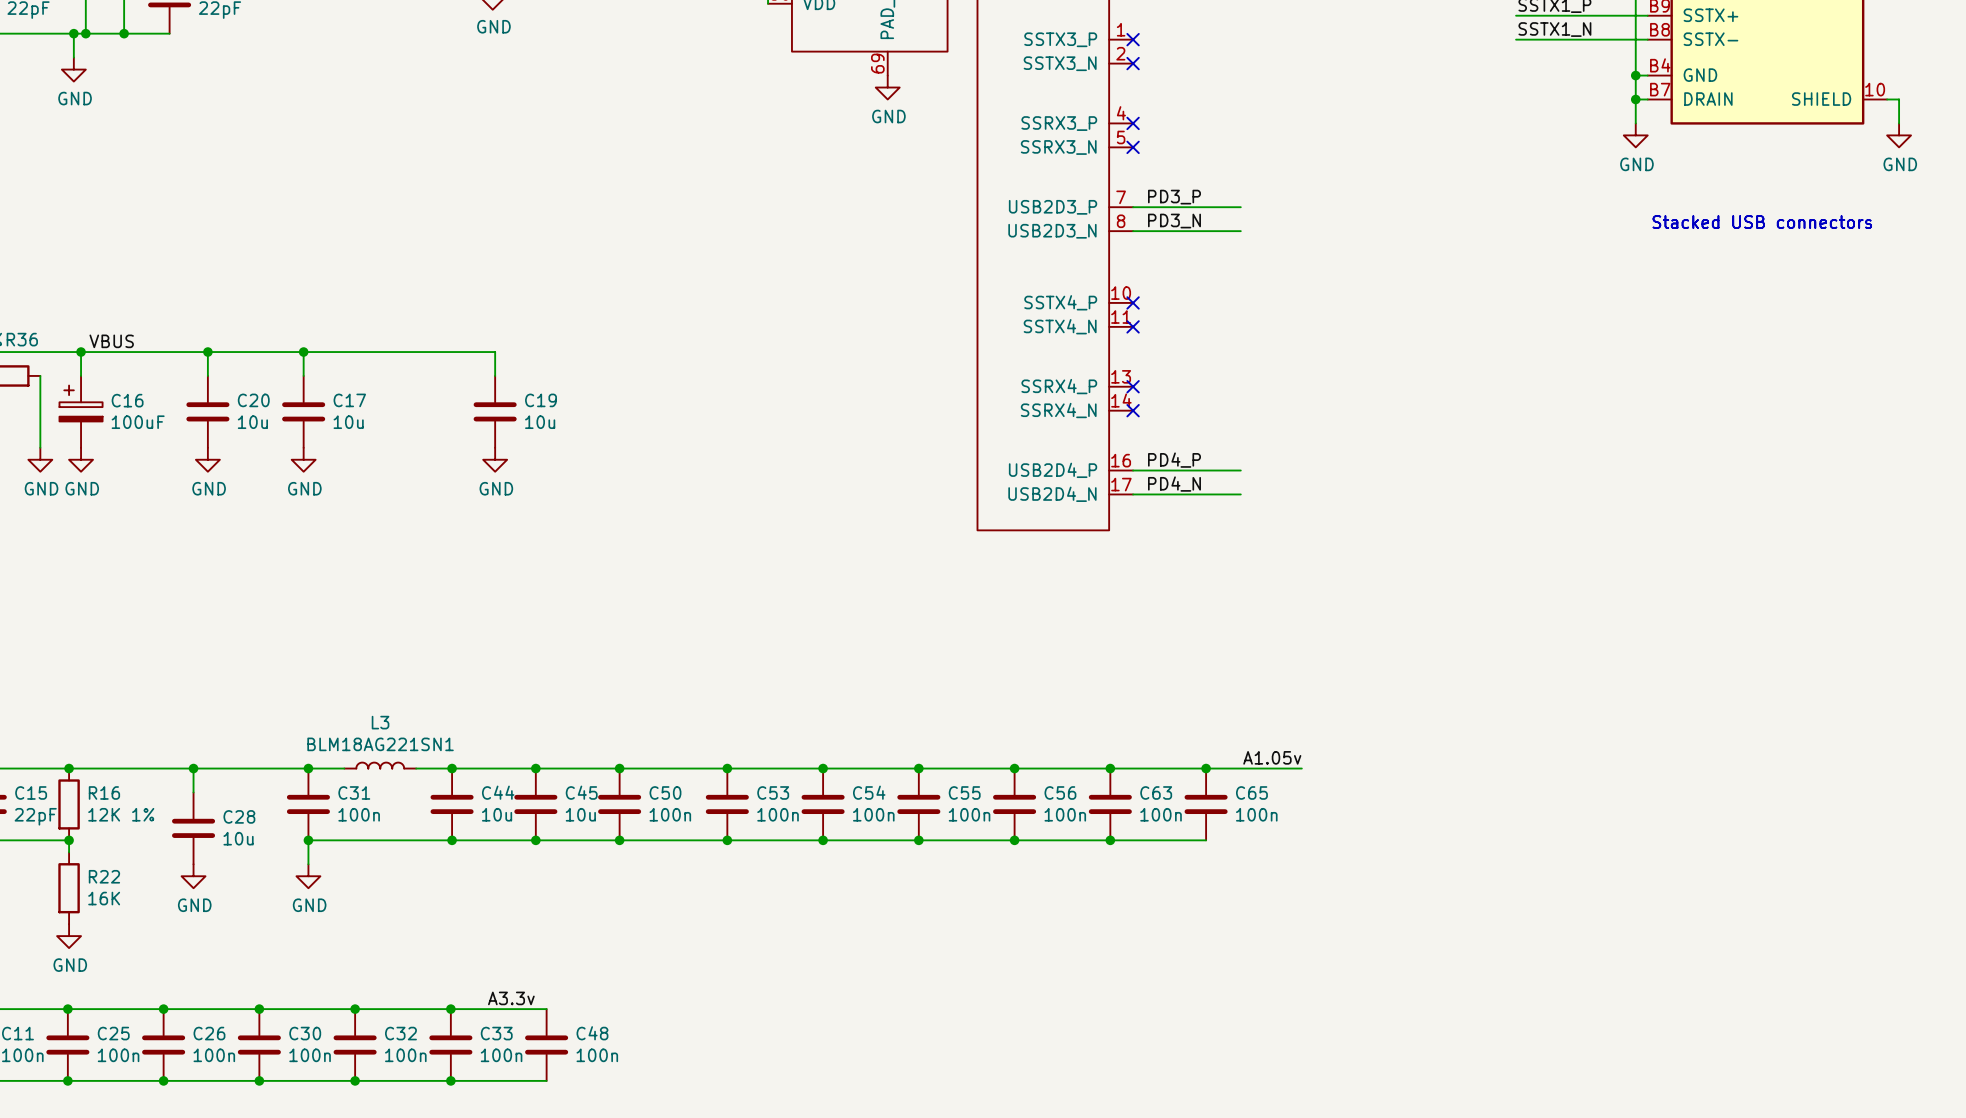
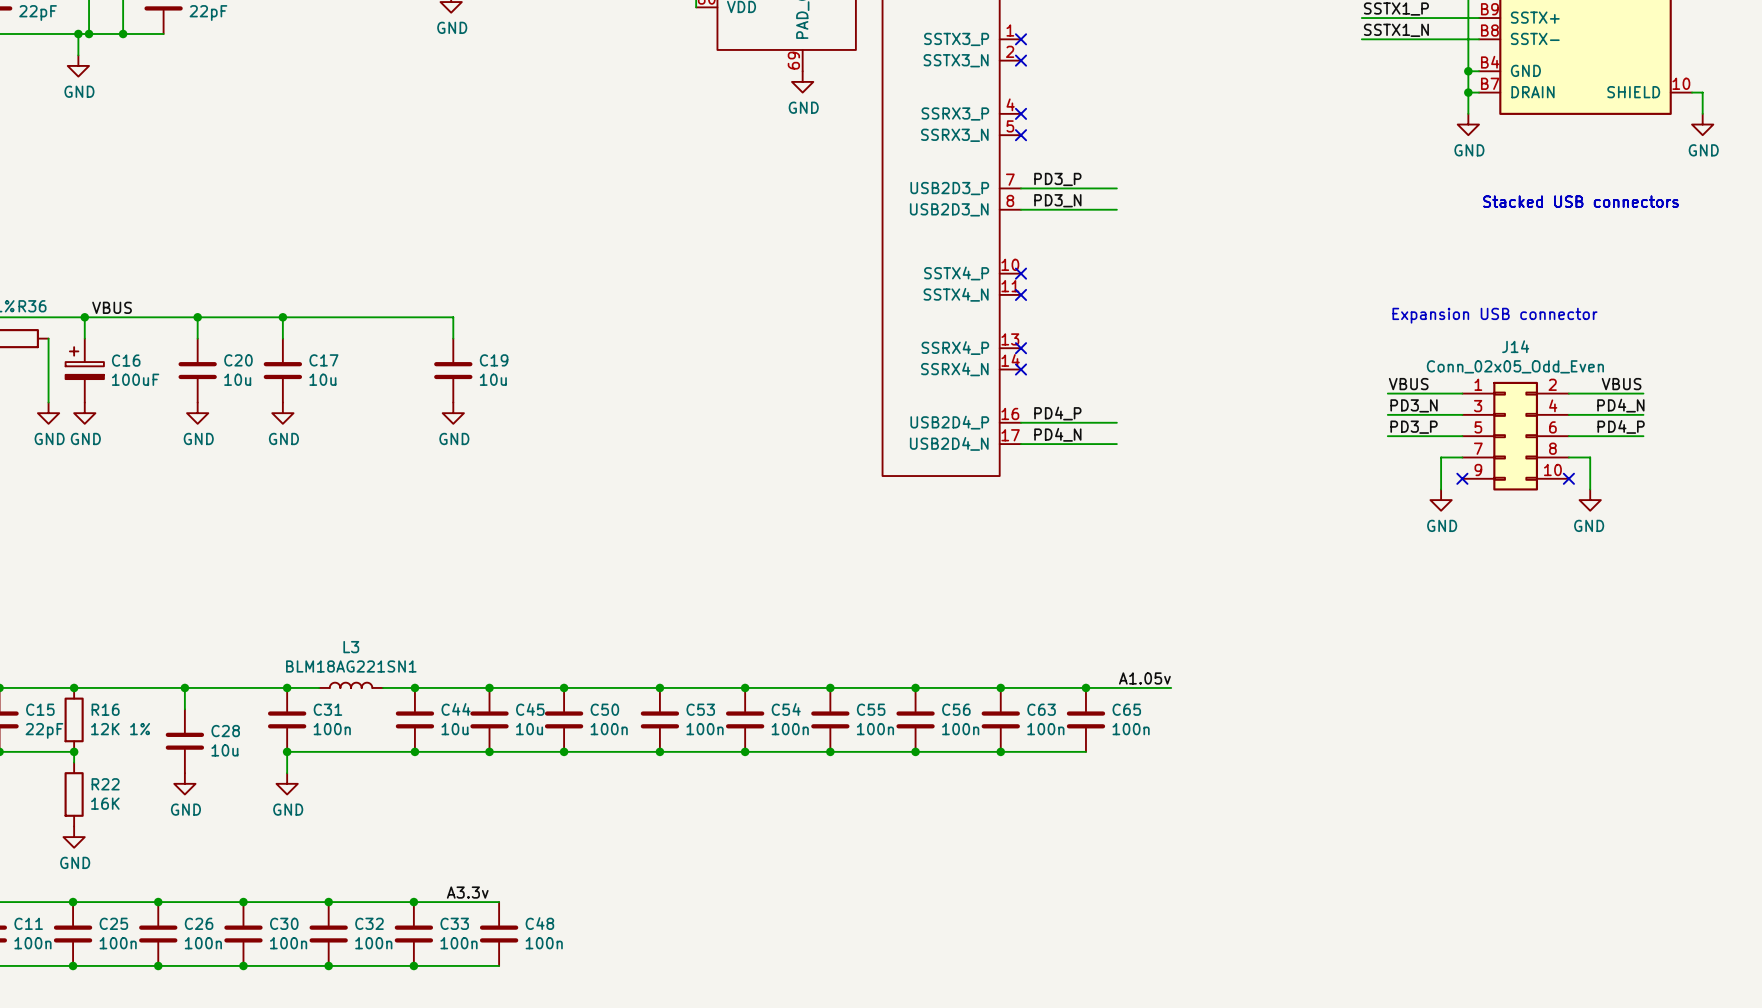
text: none -> Expansion USB connector (1494, 315)
label: none -> VBUS (1408, 384)
label: none -> VBUS (1621, 384)
wire: none -> (1387, 393) (1462, 393)
wire: none -> (1568, 393) (1643, 393)
label: none -> PD3_N (1414, 405)
label: none -> PD4_N (1620, 405)
wire: none -> (1387, 414) (1462, 414)
wire: none -> (1568, 414) (1643, 414)
label: none -> PD3_P (1414, 427)
label: none -> PD4_P (1621, 426)
wire: none -> (1387, 436) (1462, 436)
J14: none -> Conn_02x05_Odd_Even (1515, 436)
wire: none -> (1568, 436) (1643, 436)
wire: none -> (1462, 457) (1441, 457) (1441, 489)
wire: none -> (1568, 457) (1590, 457) (1590, 489)
no-connect mark: none -> (1462, 478)
no-connect mark: none -> (1568, 478)
power symbol: none -> GND (1441, 500)
power symbol: none -> GND (1590, 500)

